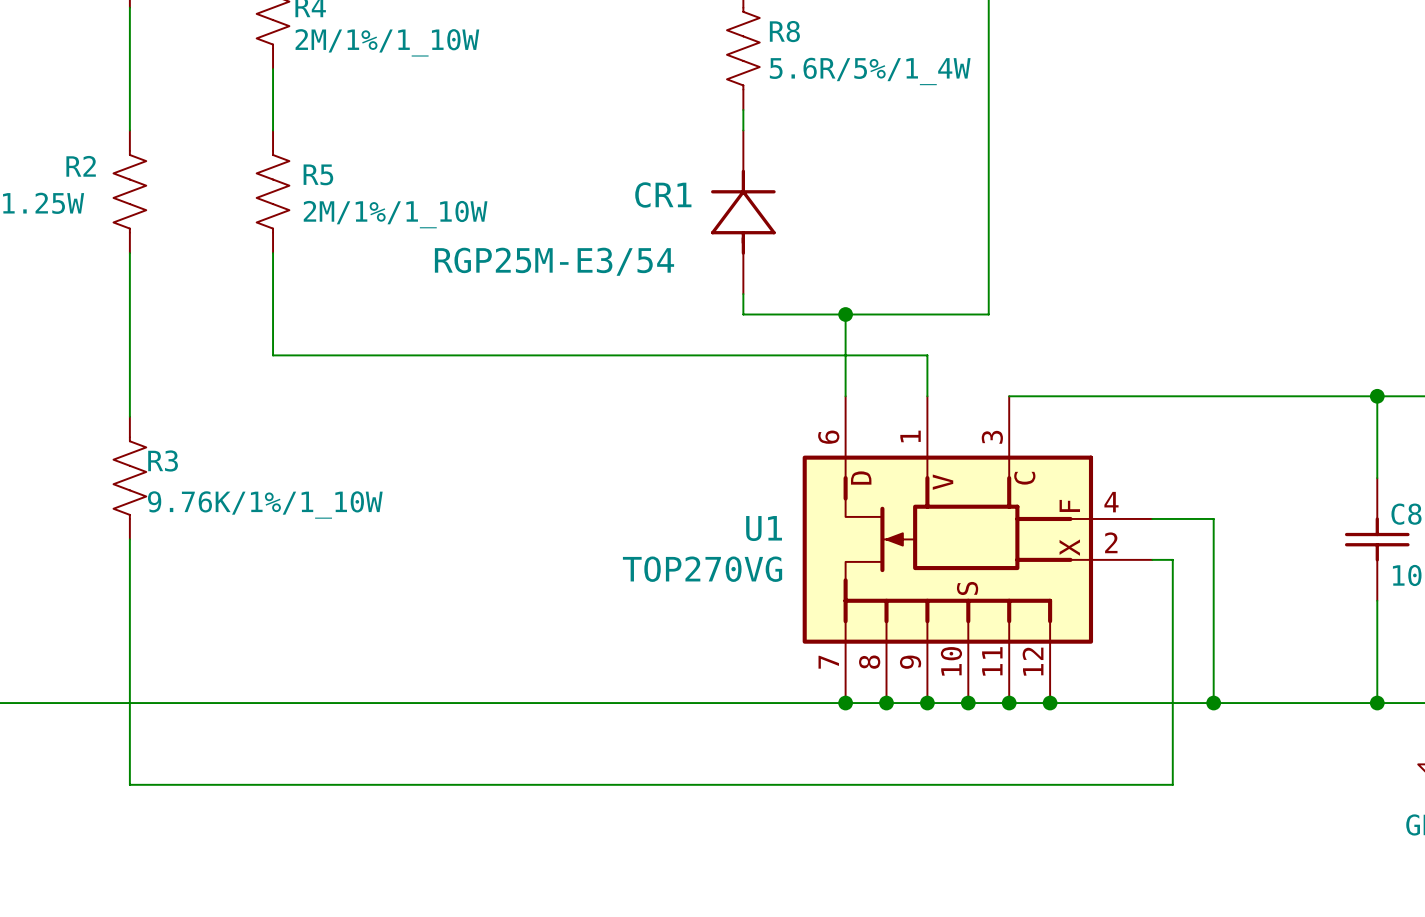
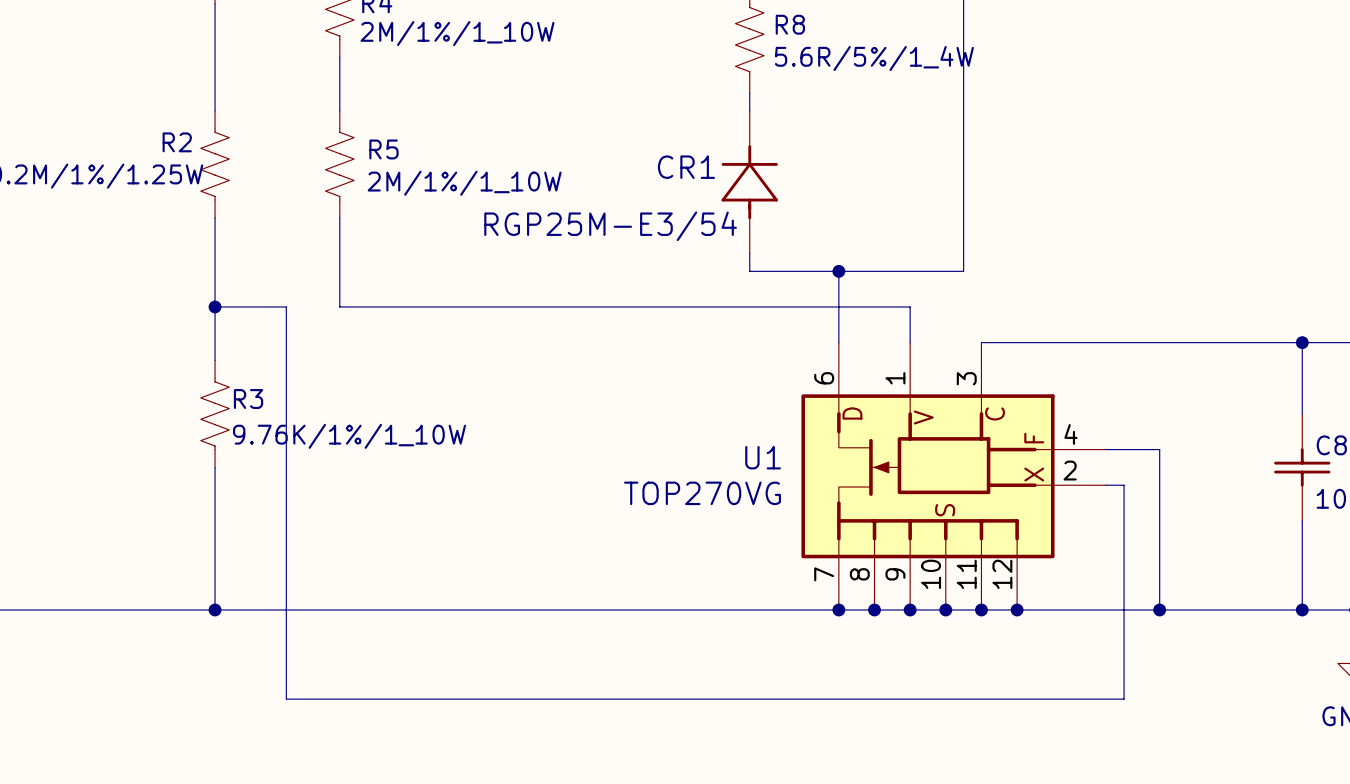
junction: none -> (215, 306)
wire: (129, 703) (129, 784) (1172, 784) -> (215, 306) (286, 306) (286, 699) (1124, 699) (1124, 681)
junction: none -> (215, 609)

